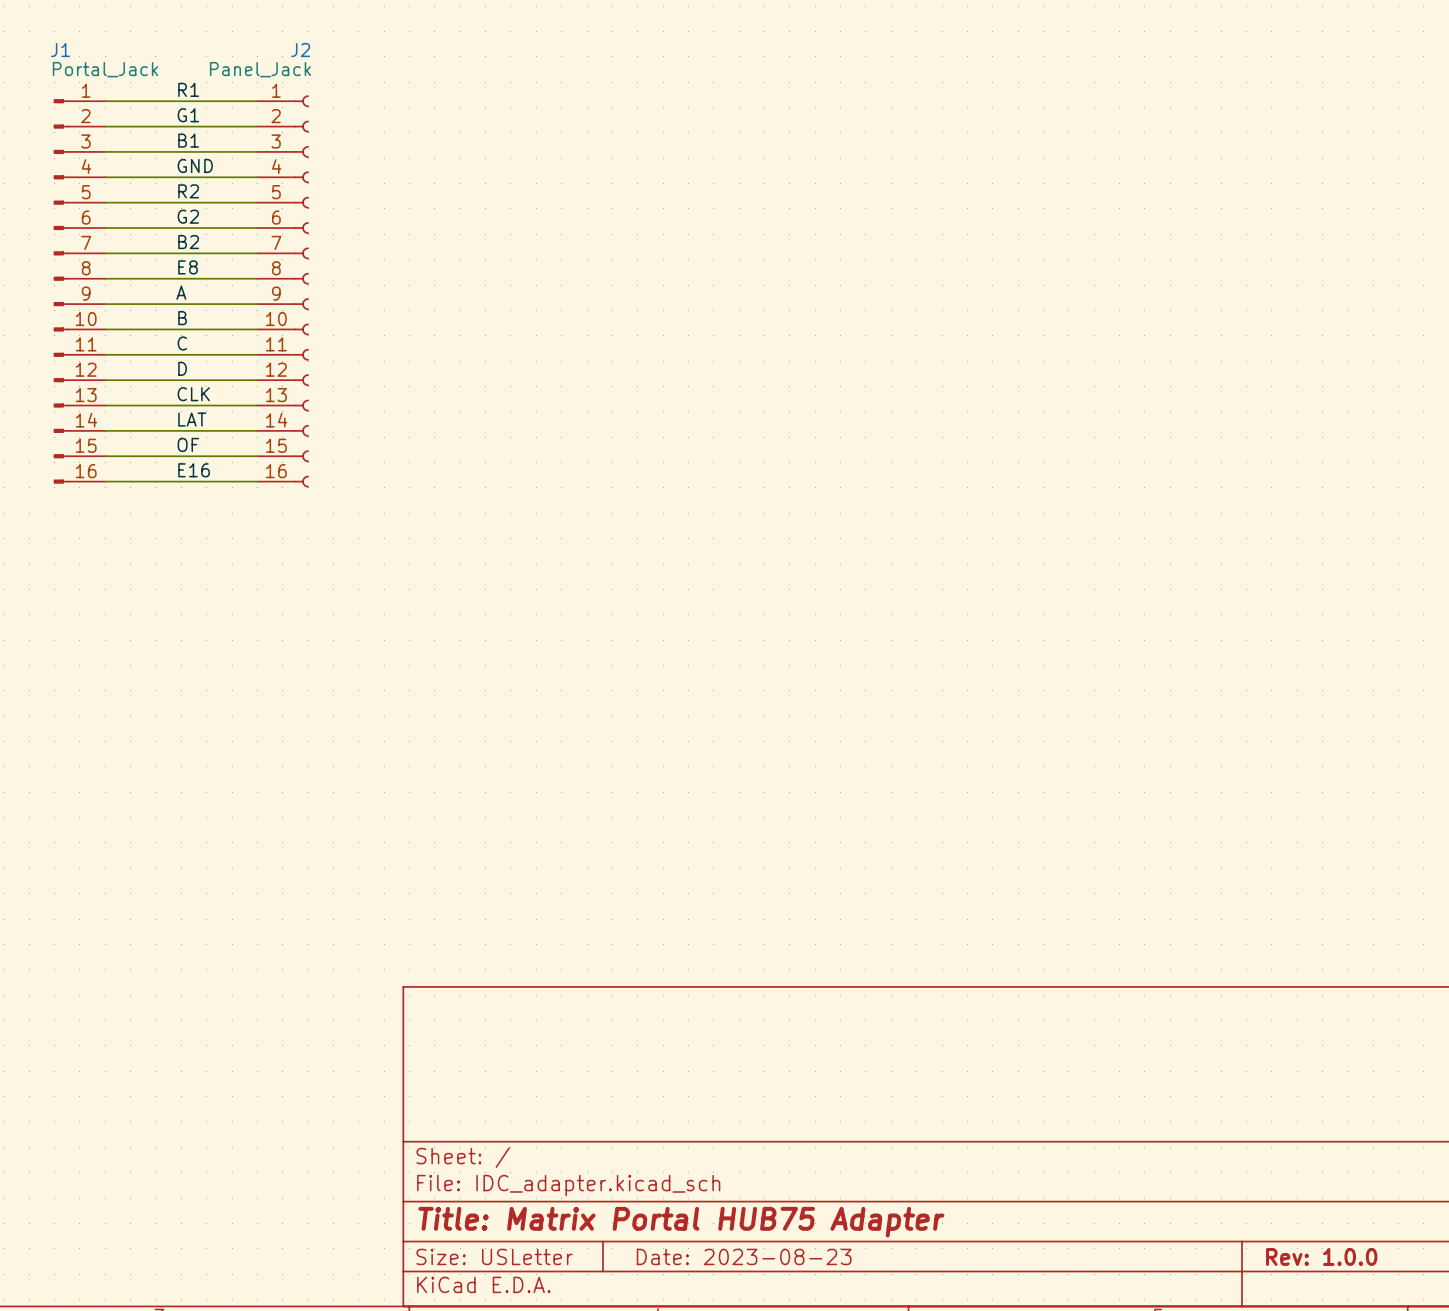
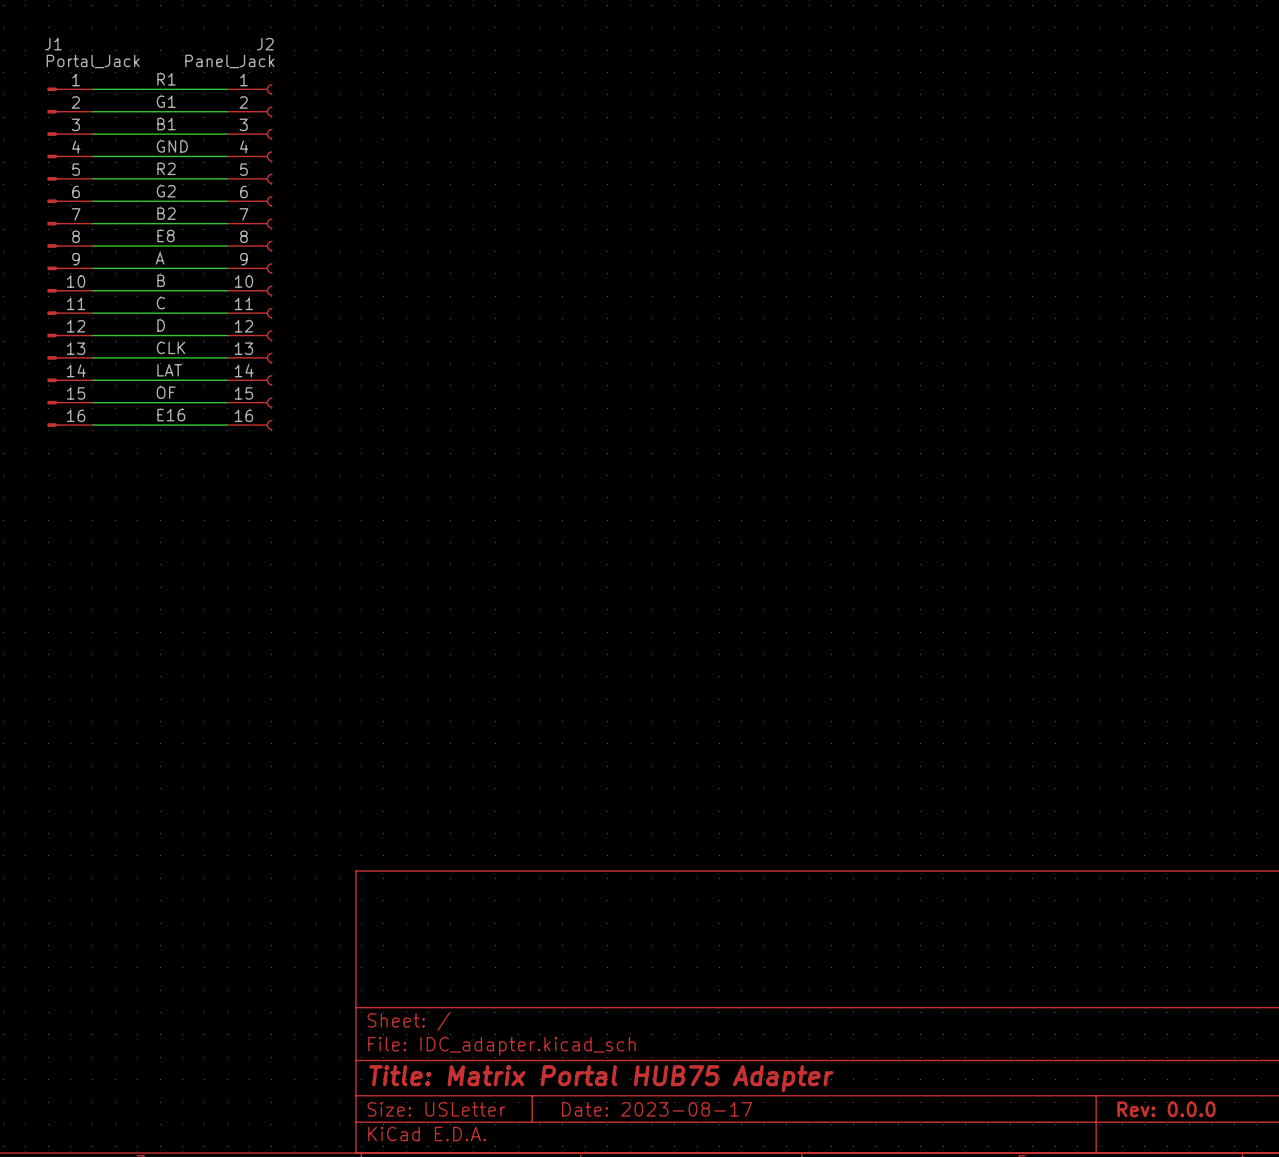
title block: Date: 2023-08-23 (744, 1256) -> Date: 2023-08-17 (657, 1109)
title block: Rev: 1.0.0 (1321, 1256) -> Rev: 0.0.0 (1166, 1109)

